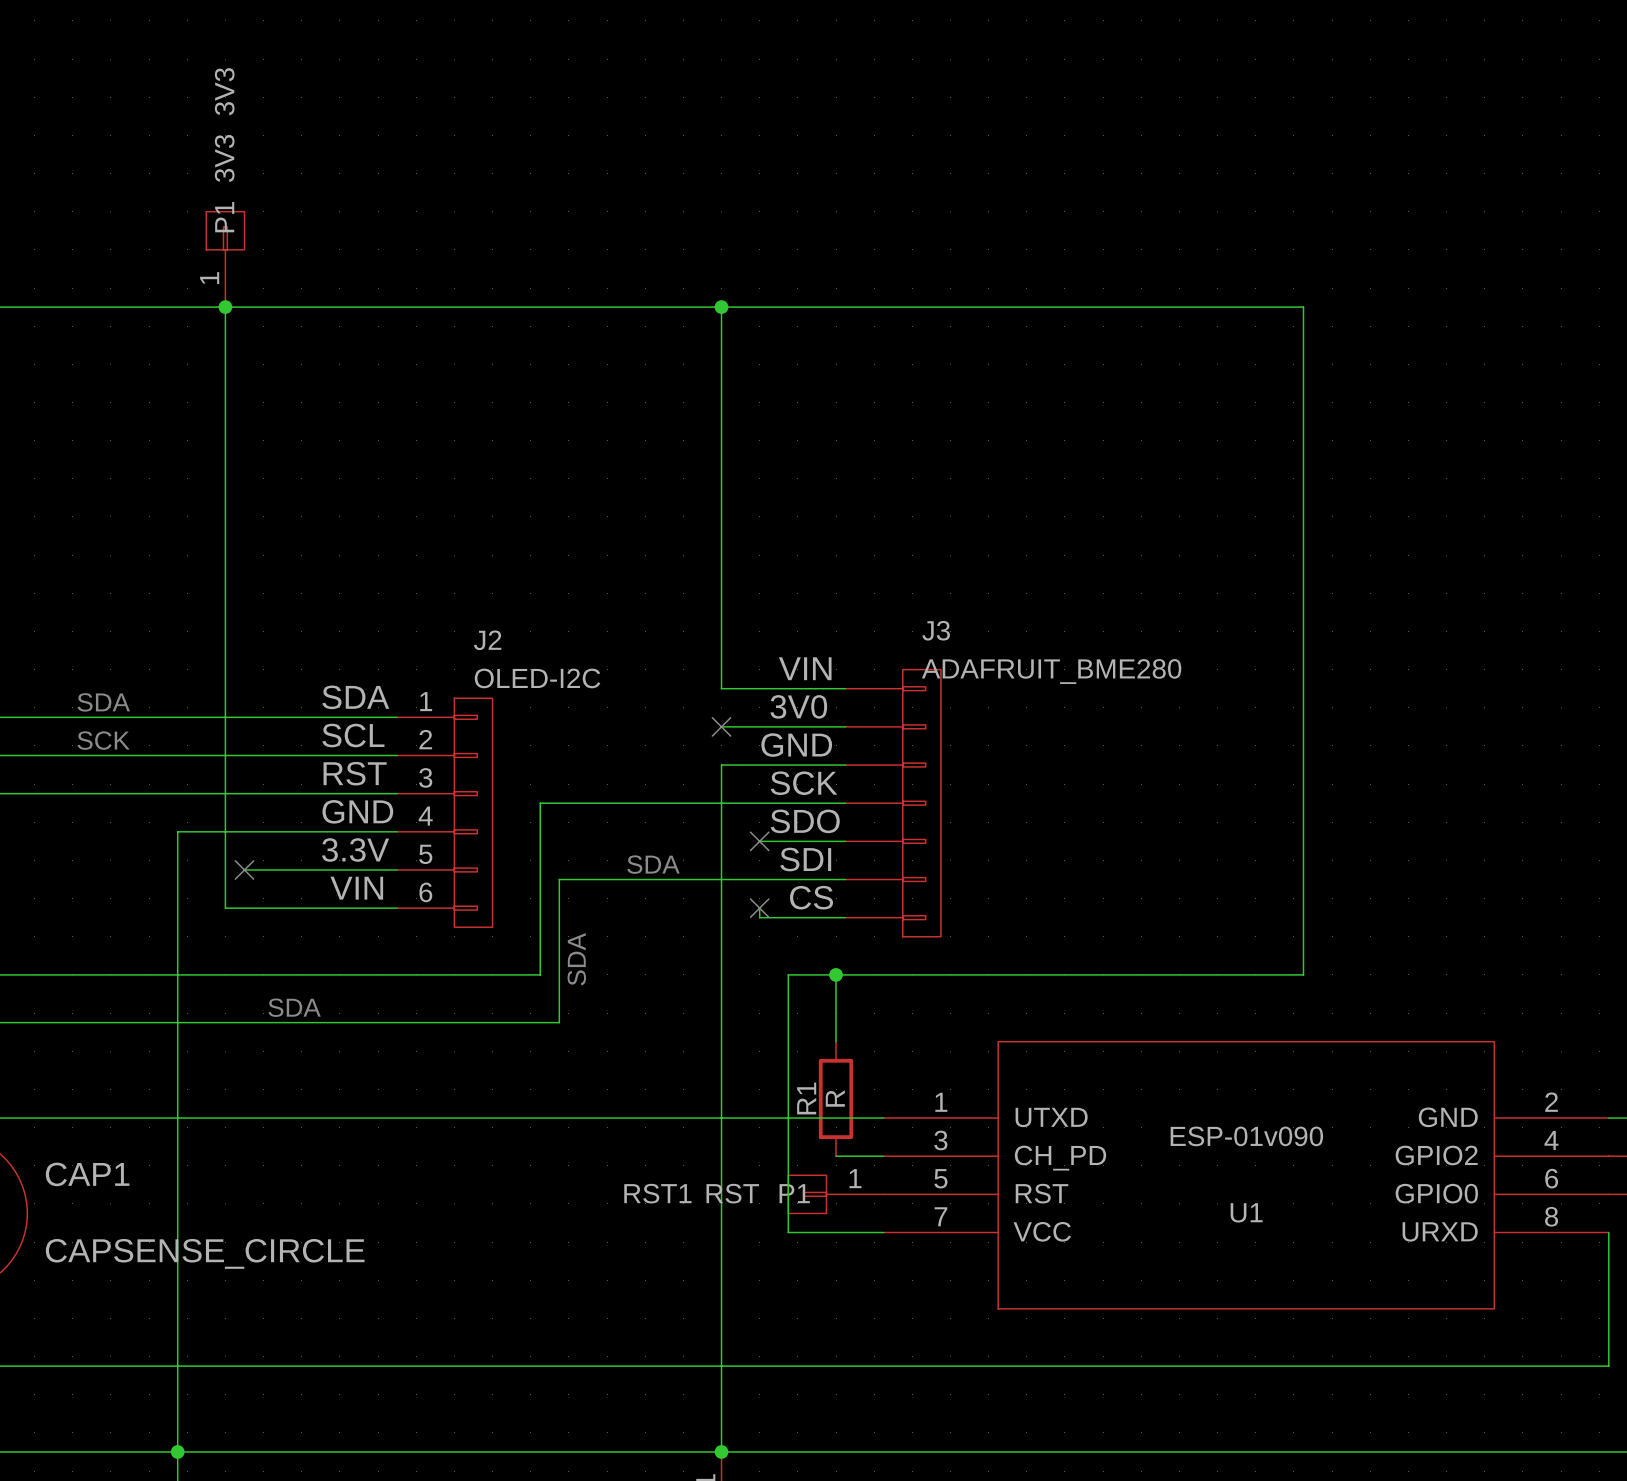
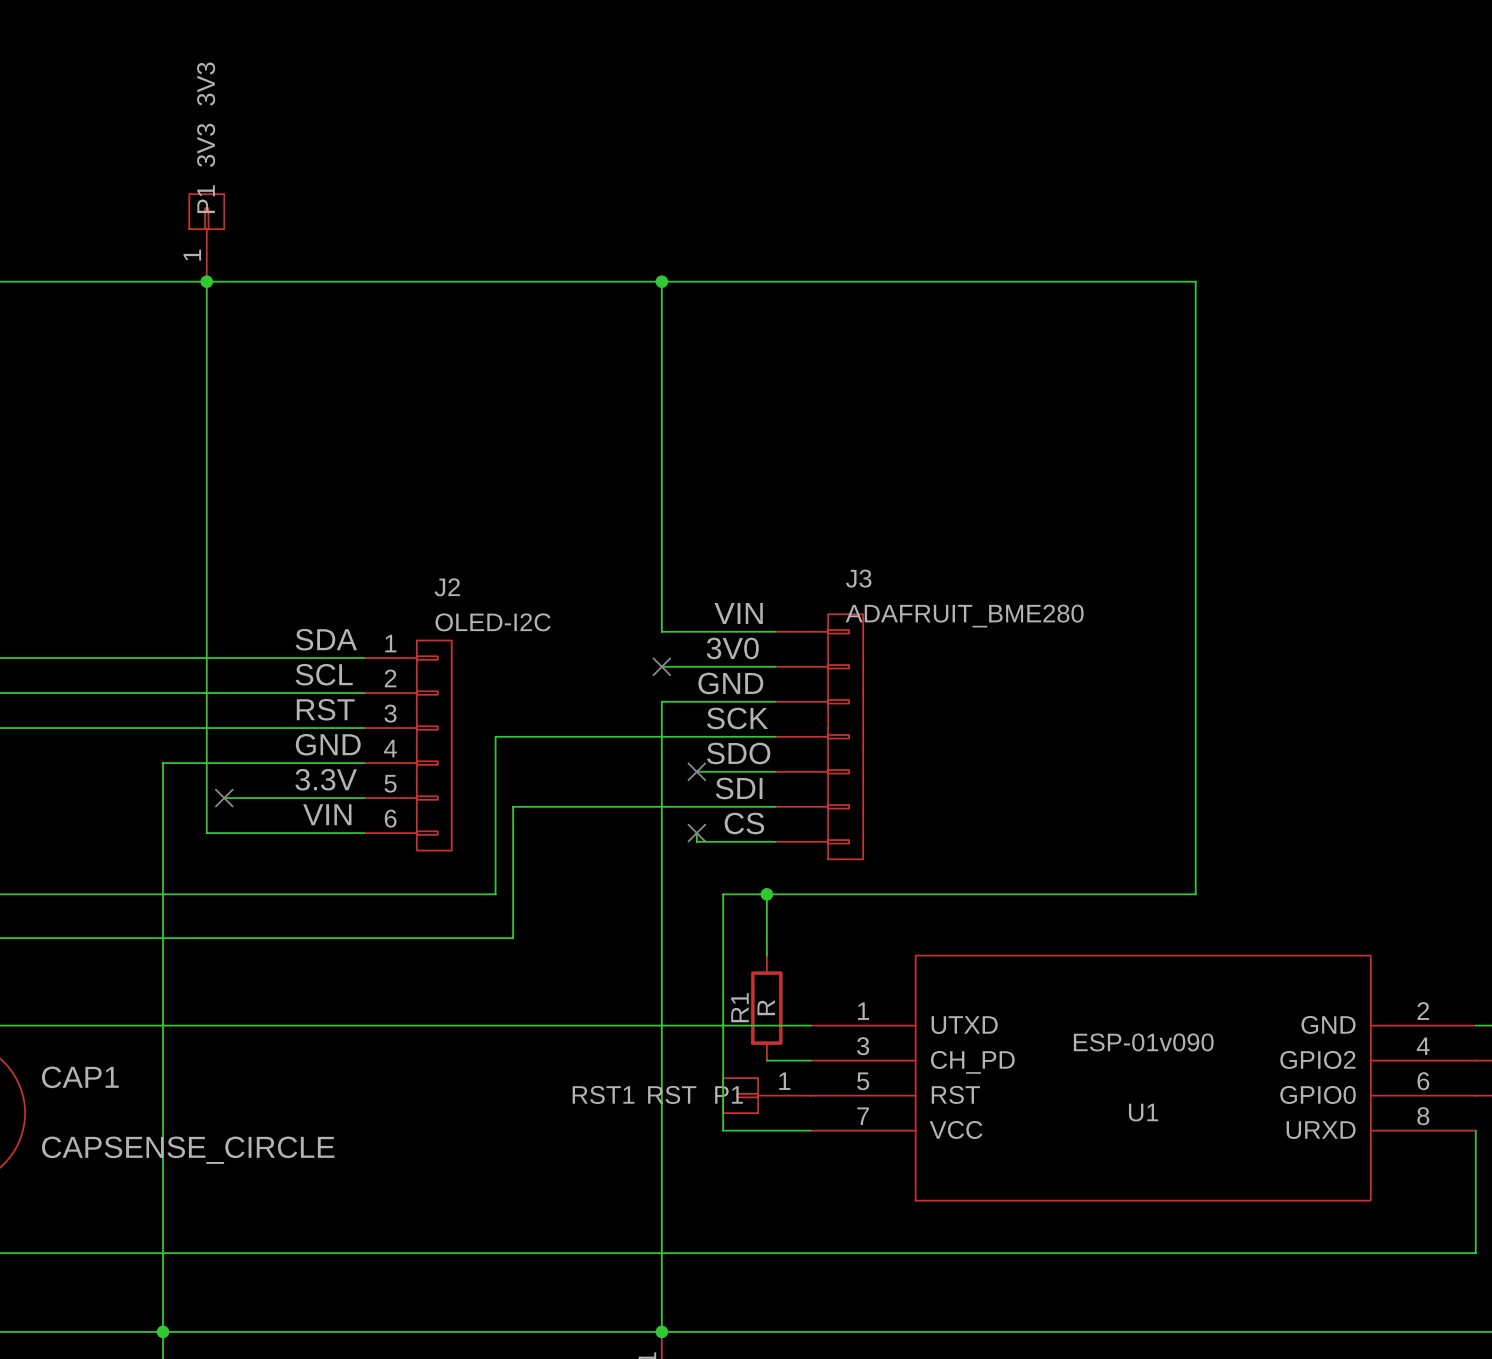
text: SDA (103, 702) -> none
text: SCK (103, 740) -> none
text: SDA (653, 864) -> none
text: SDA (576, 959) -> none
text: SDA (294, 1007) -> none

